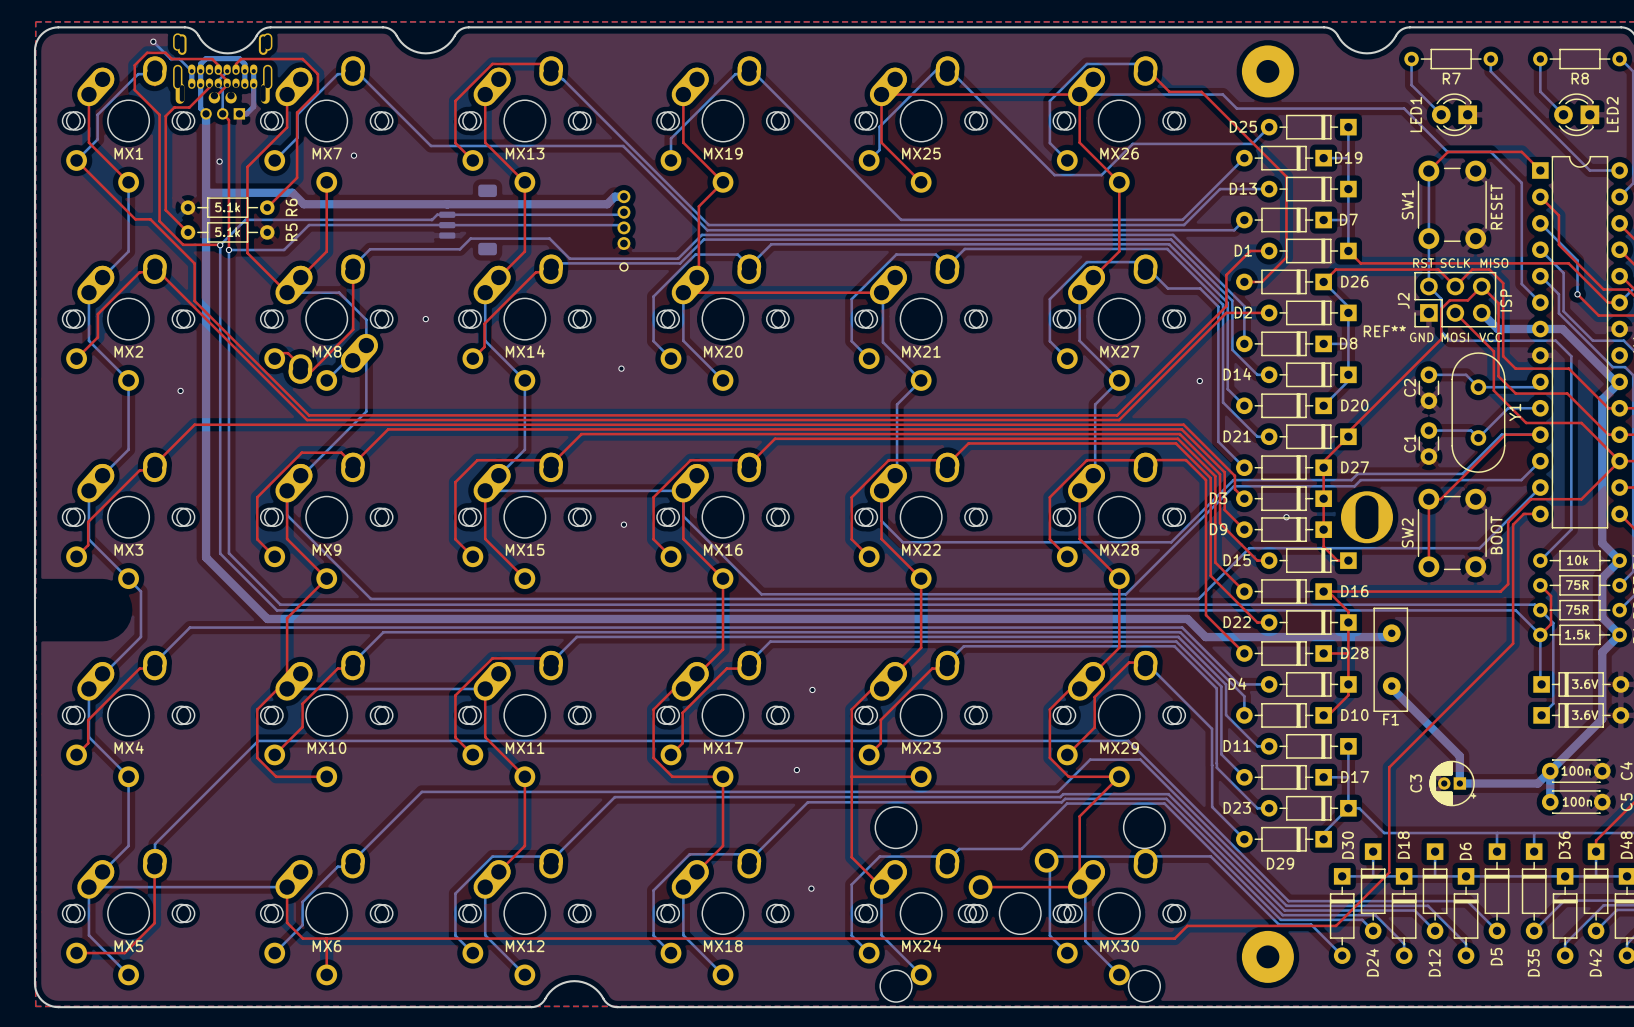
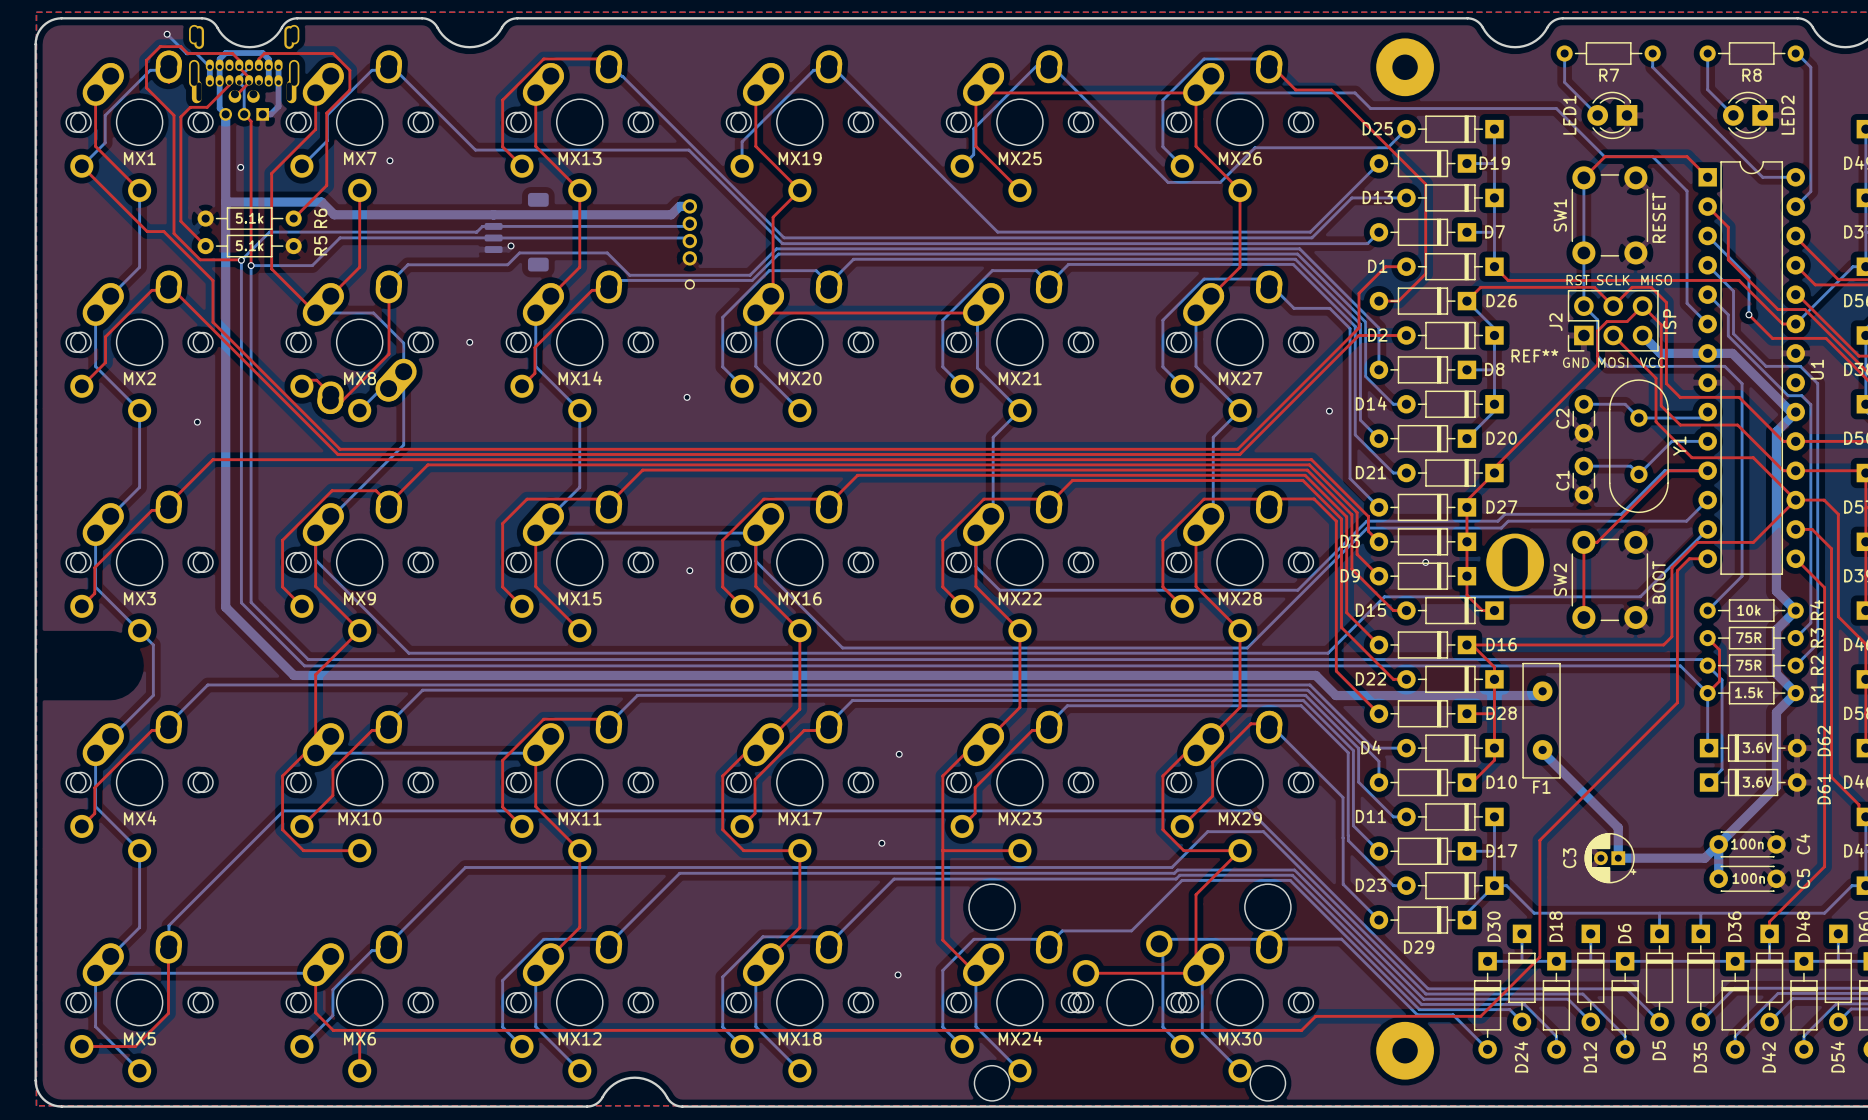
via: none -> (511, 245)

